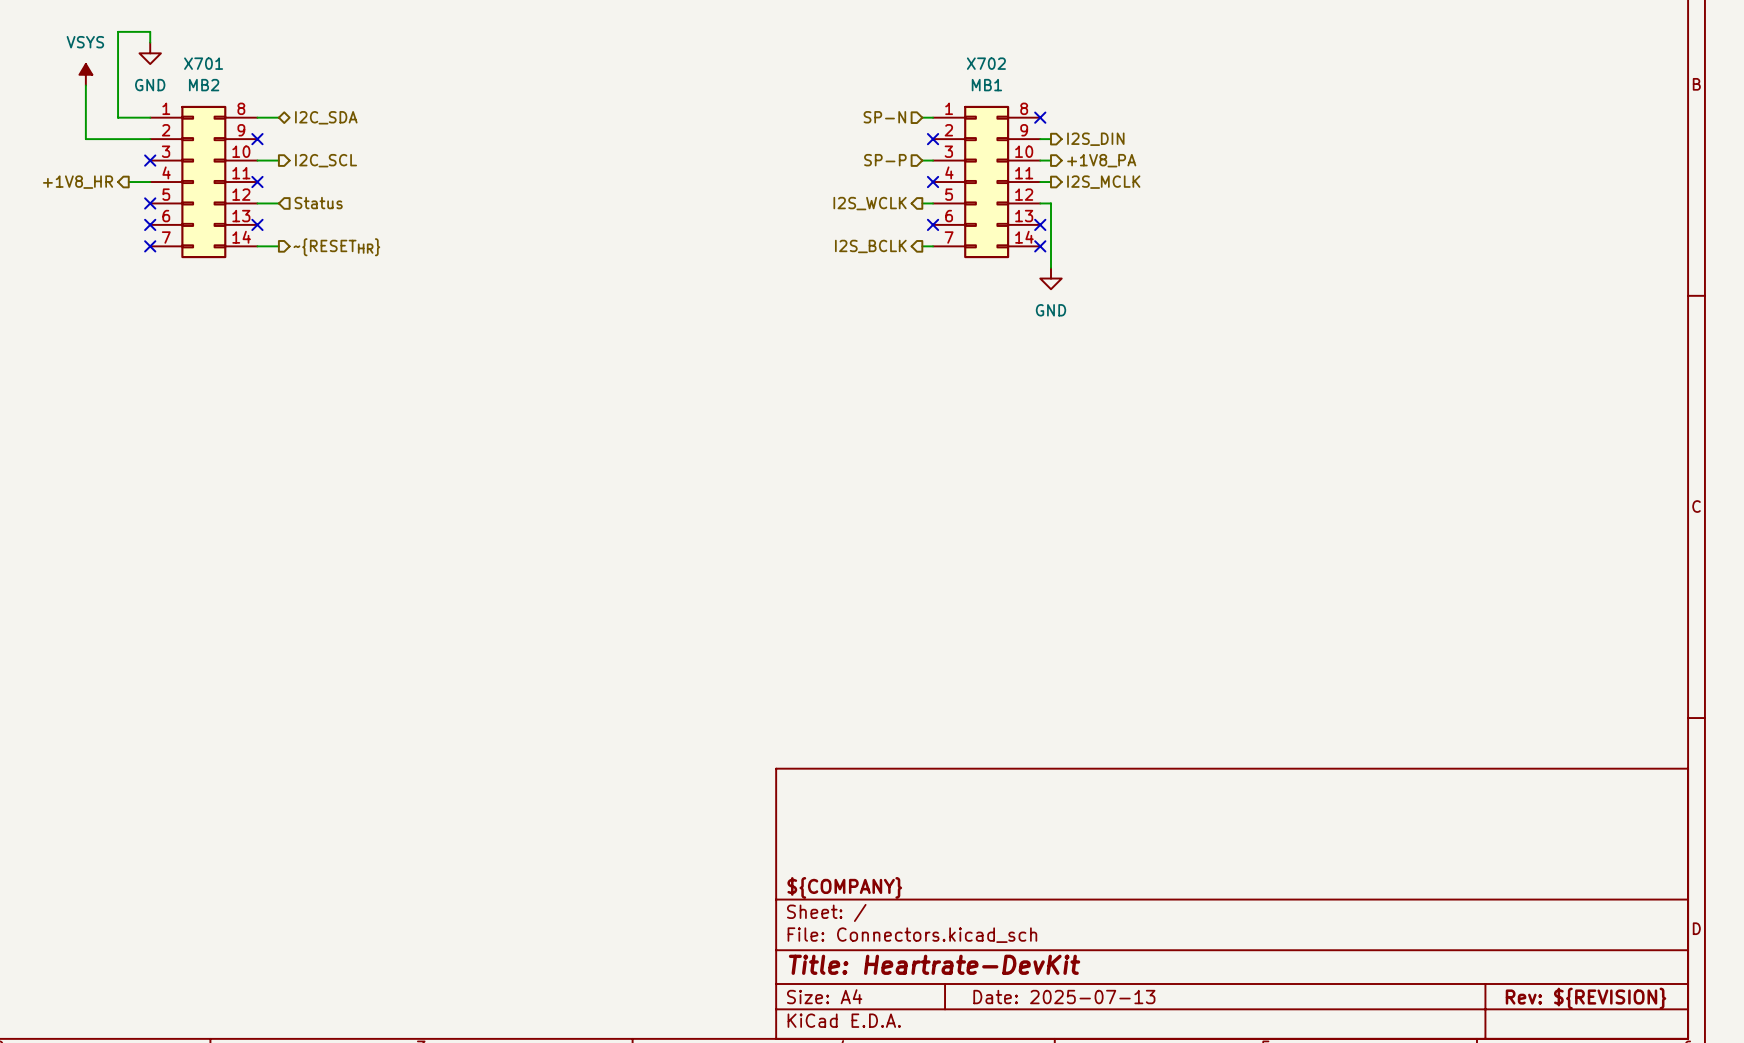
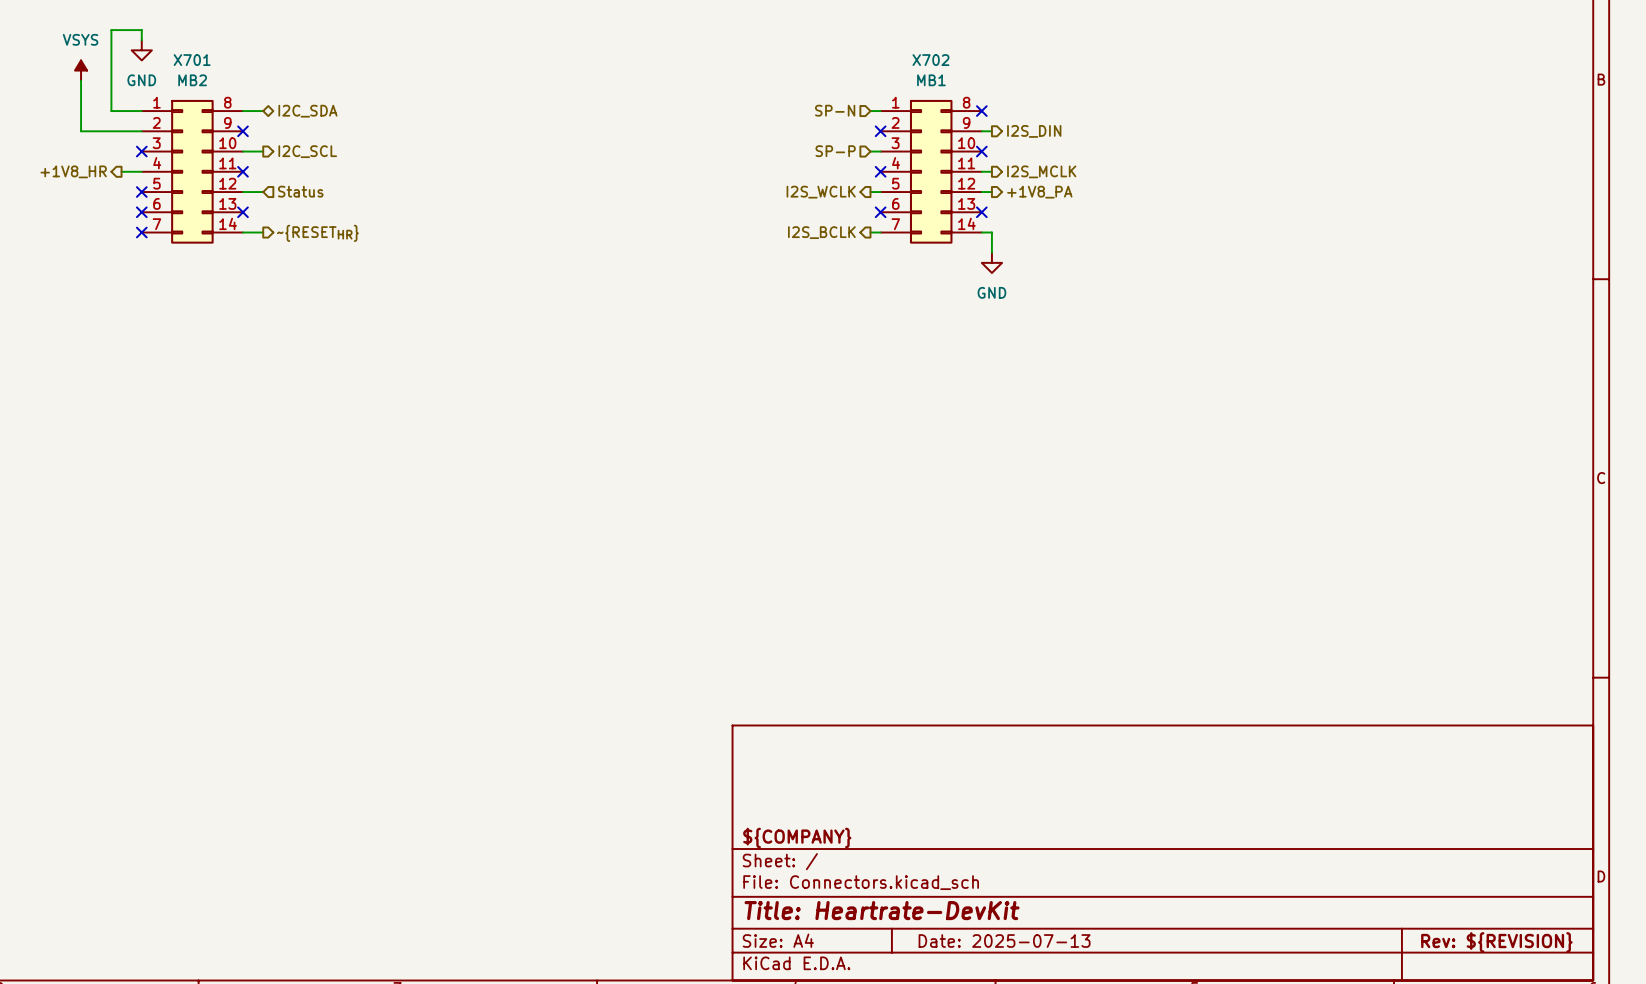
wire: (1040, 160) (1050, 160) -> none
no-connect mark: none -> (981, 151)
hierarchical label position: +1V8_PA (1101, 160) -> +1V8_PA (1039, 192)
wire: (1050, 203) (1050, 246) -> (981, 232) (991, 232)
no-connect mark: (1040, 246) -> none

